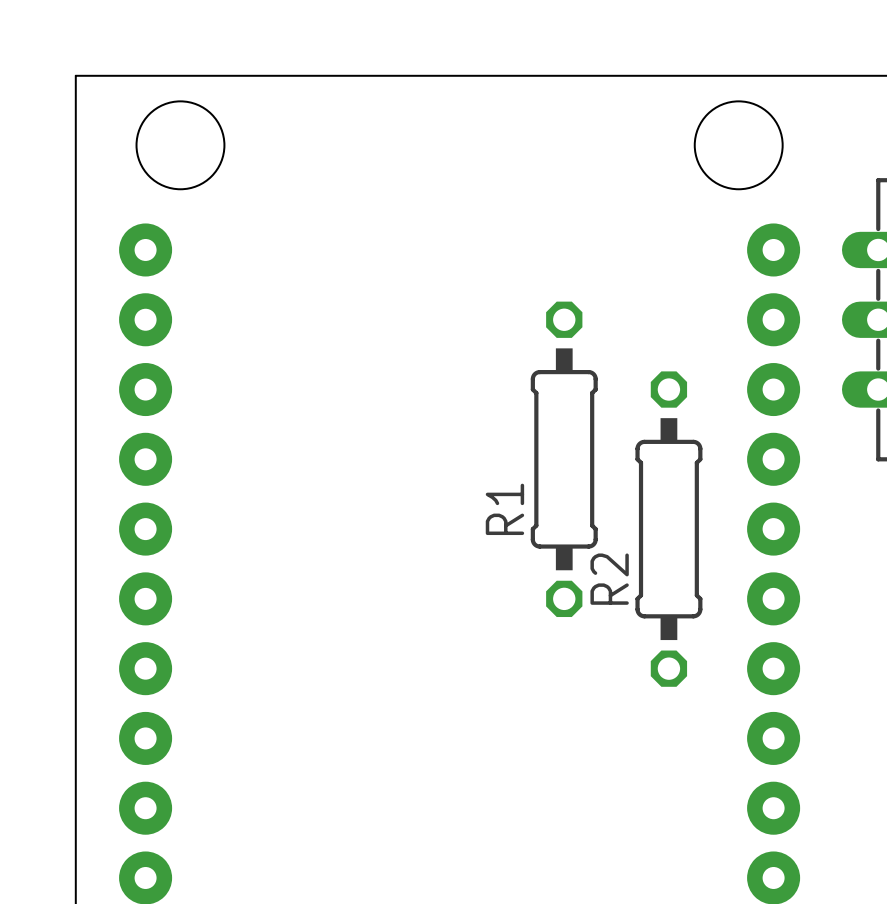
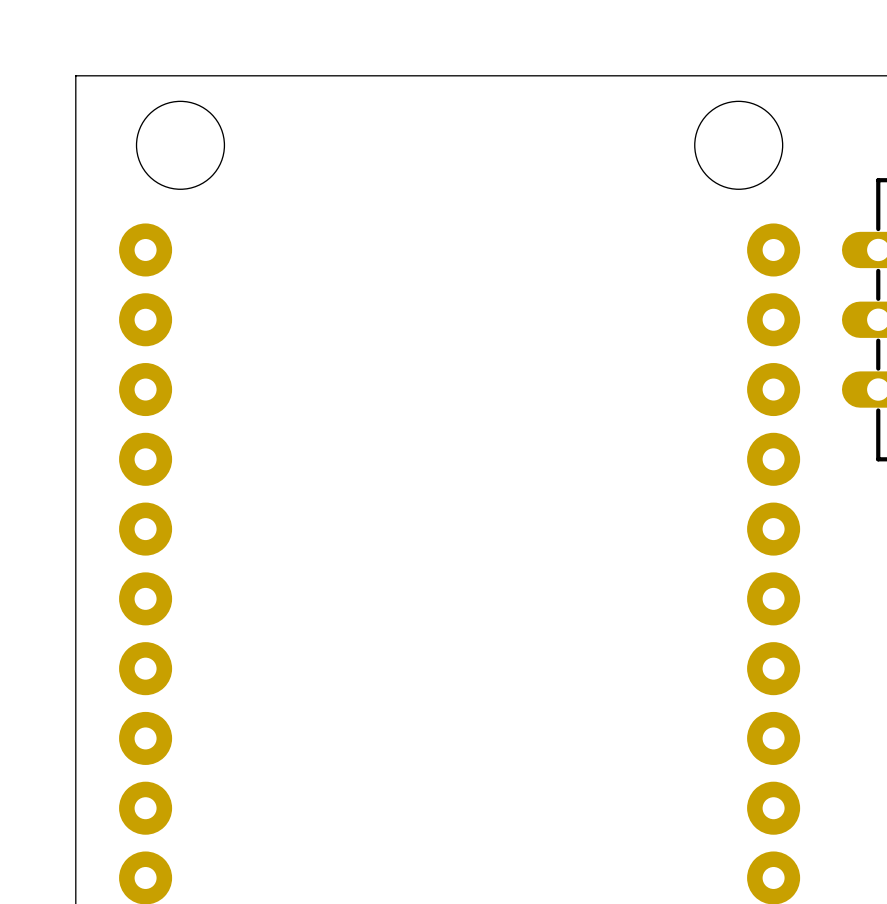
R1: (564, 459) -> none
R2: (668, 529) -> none

